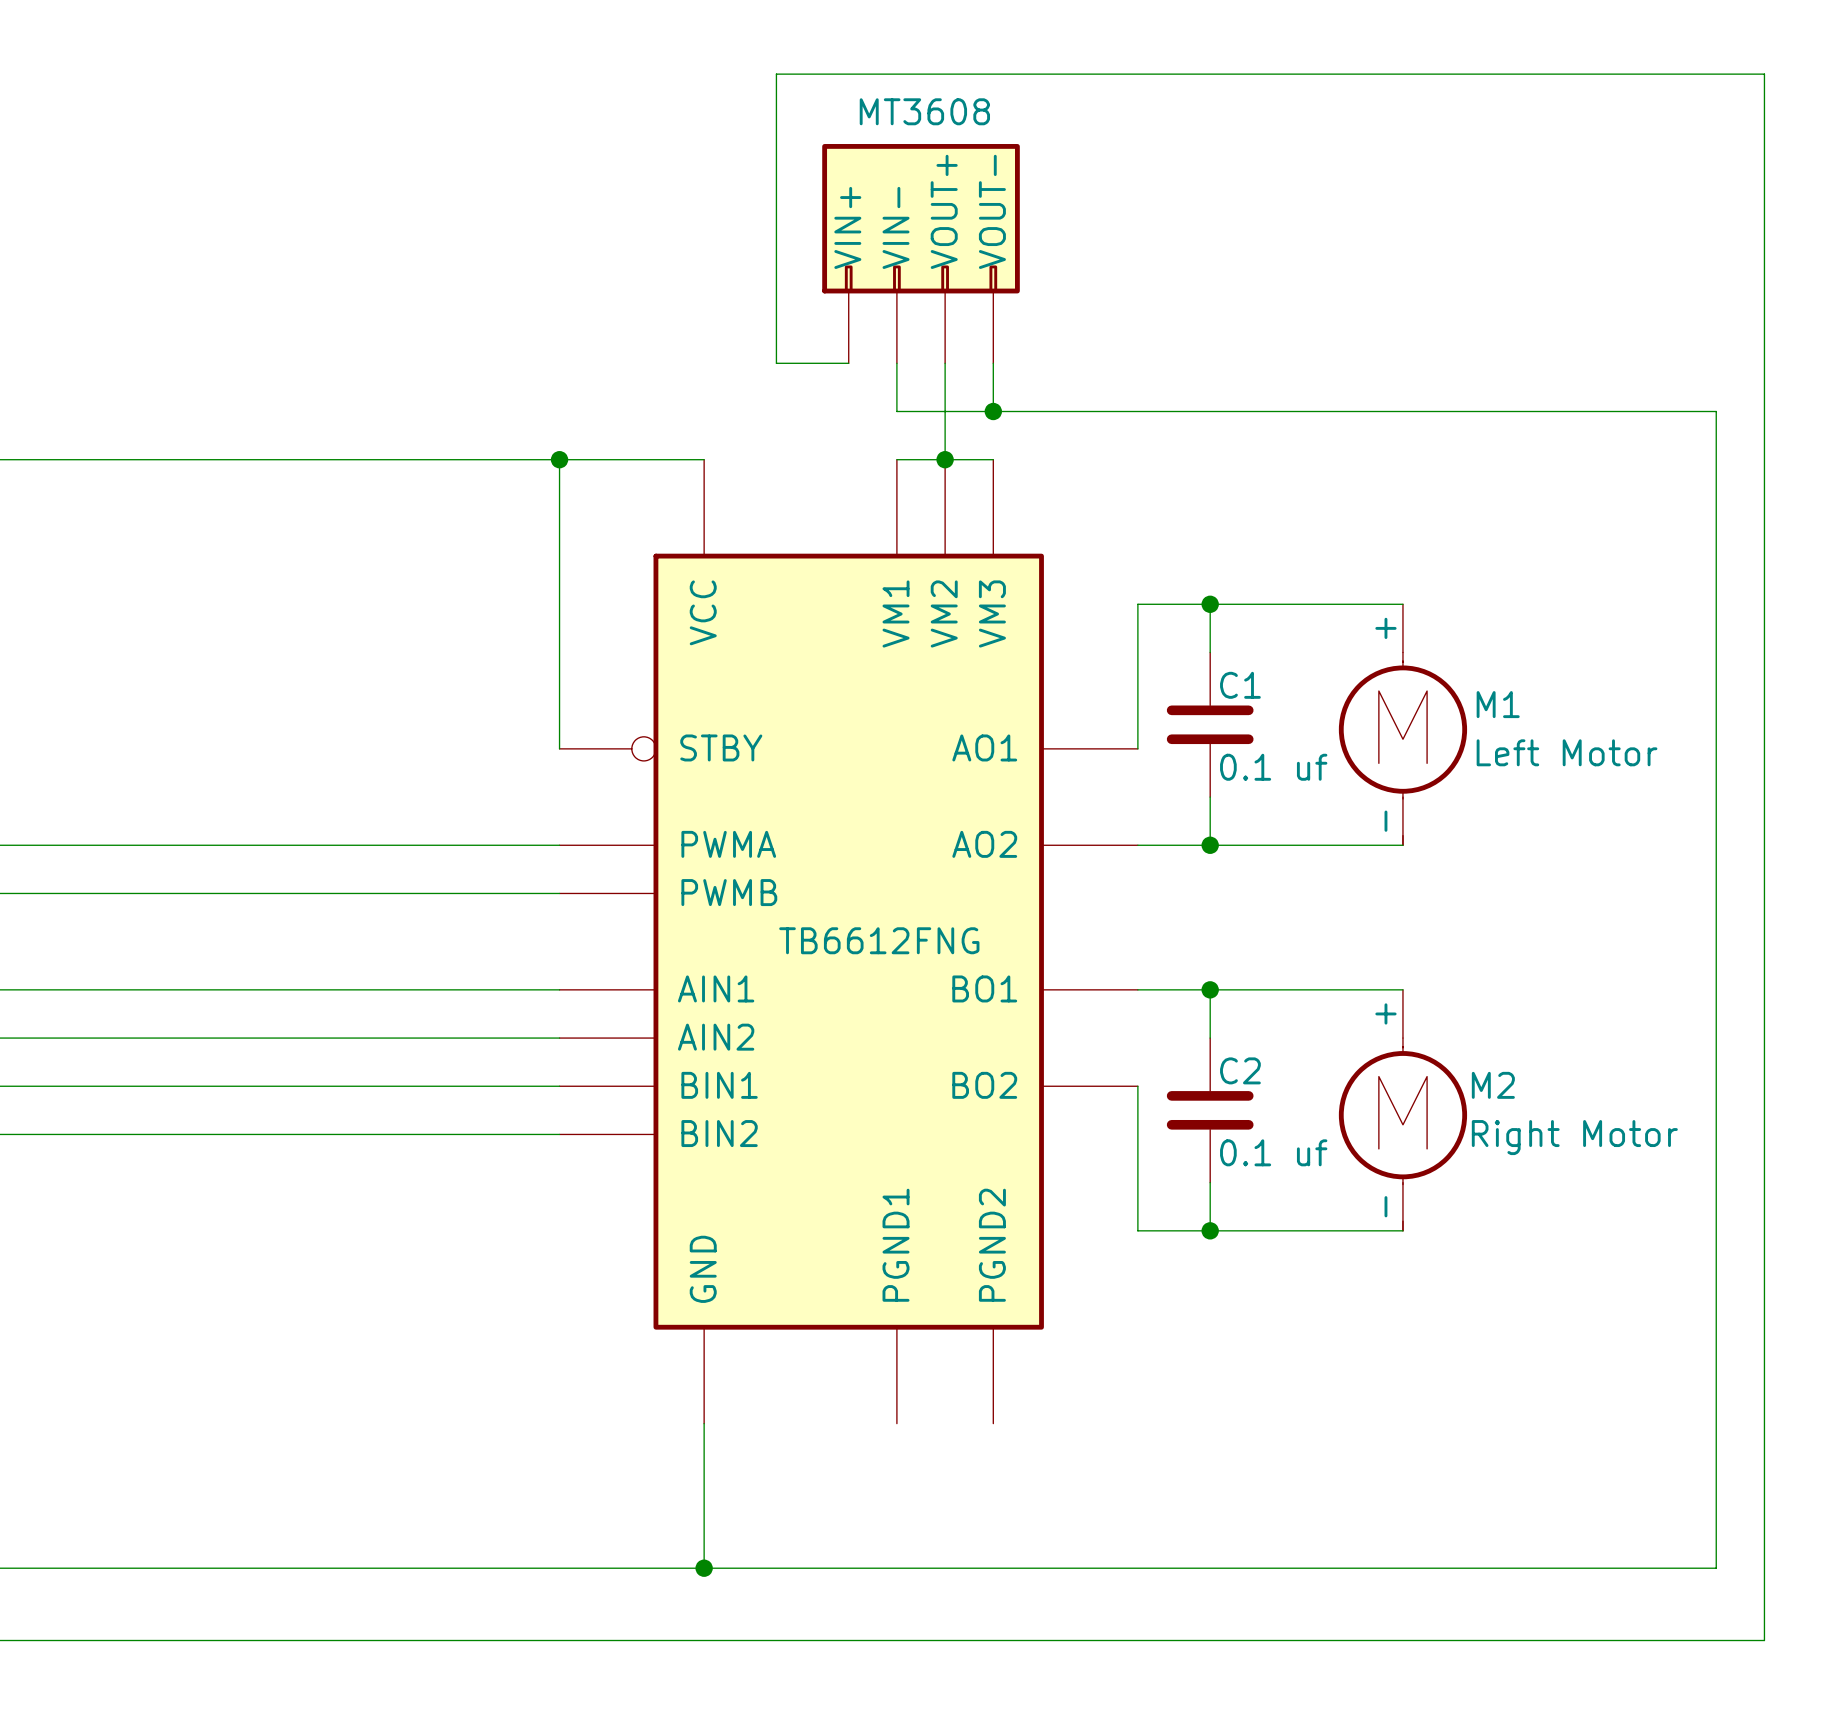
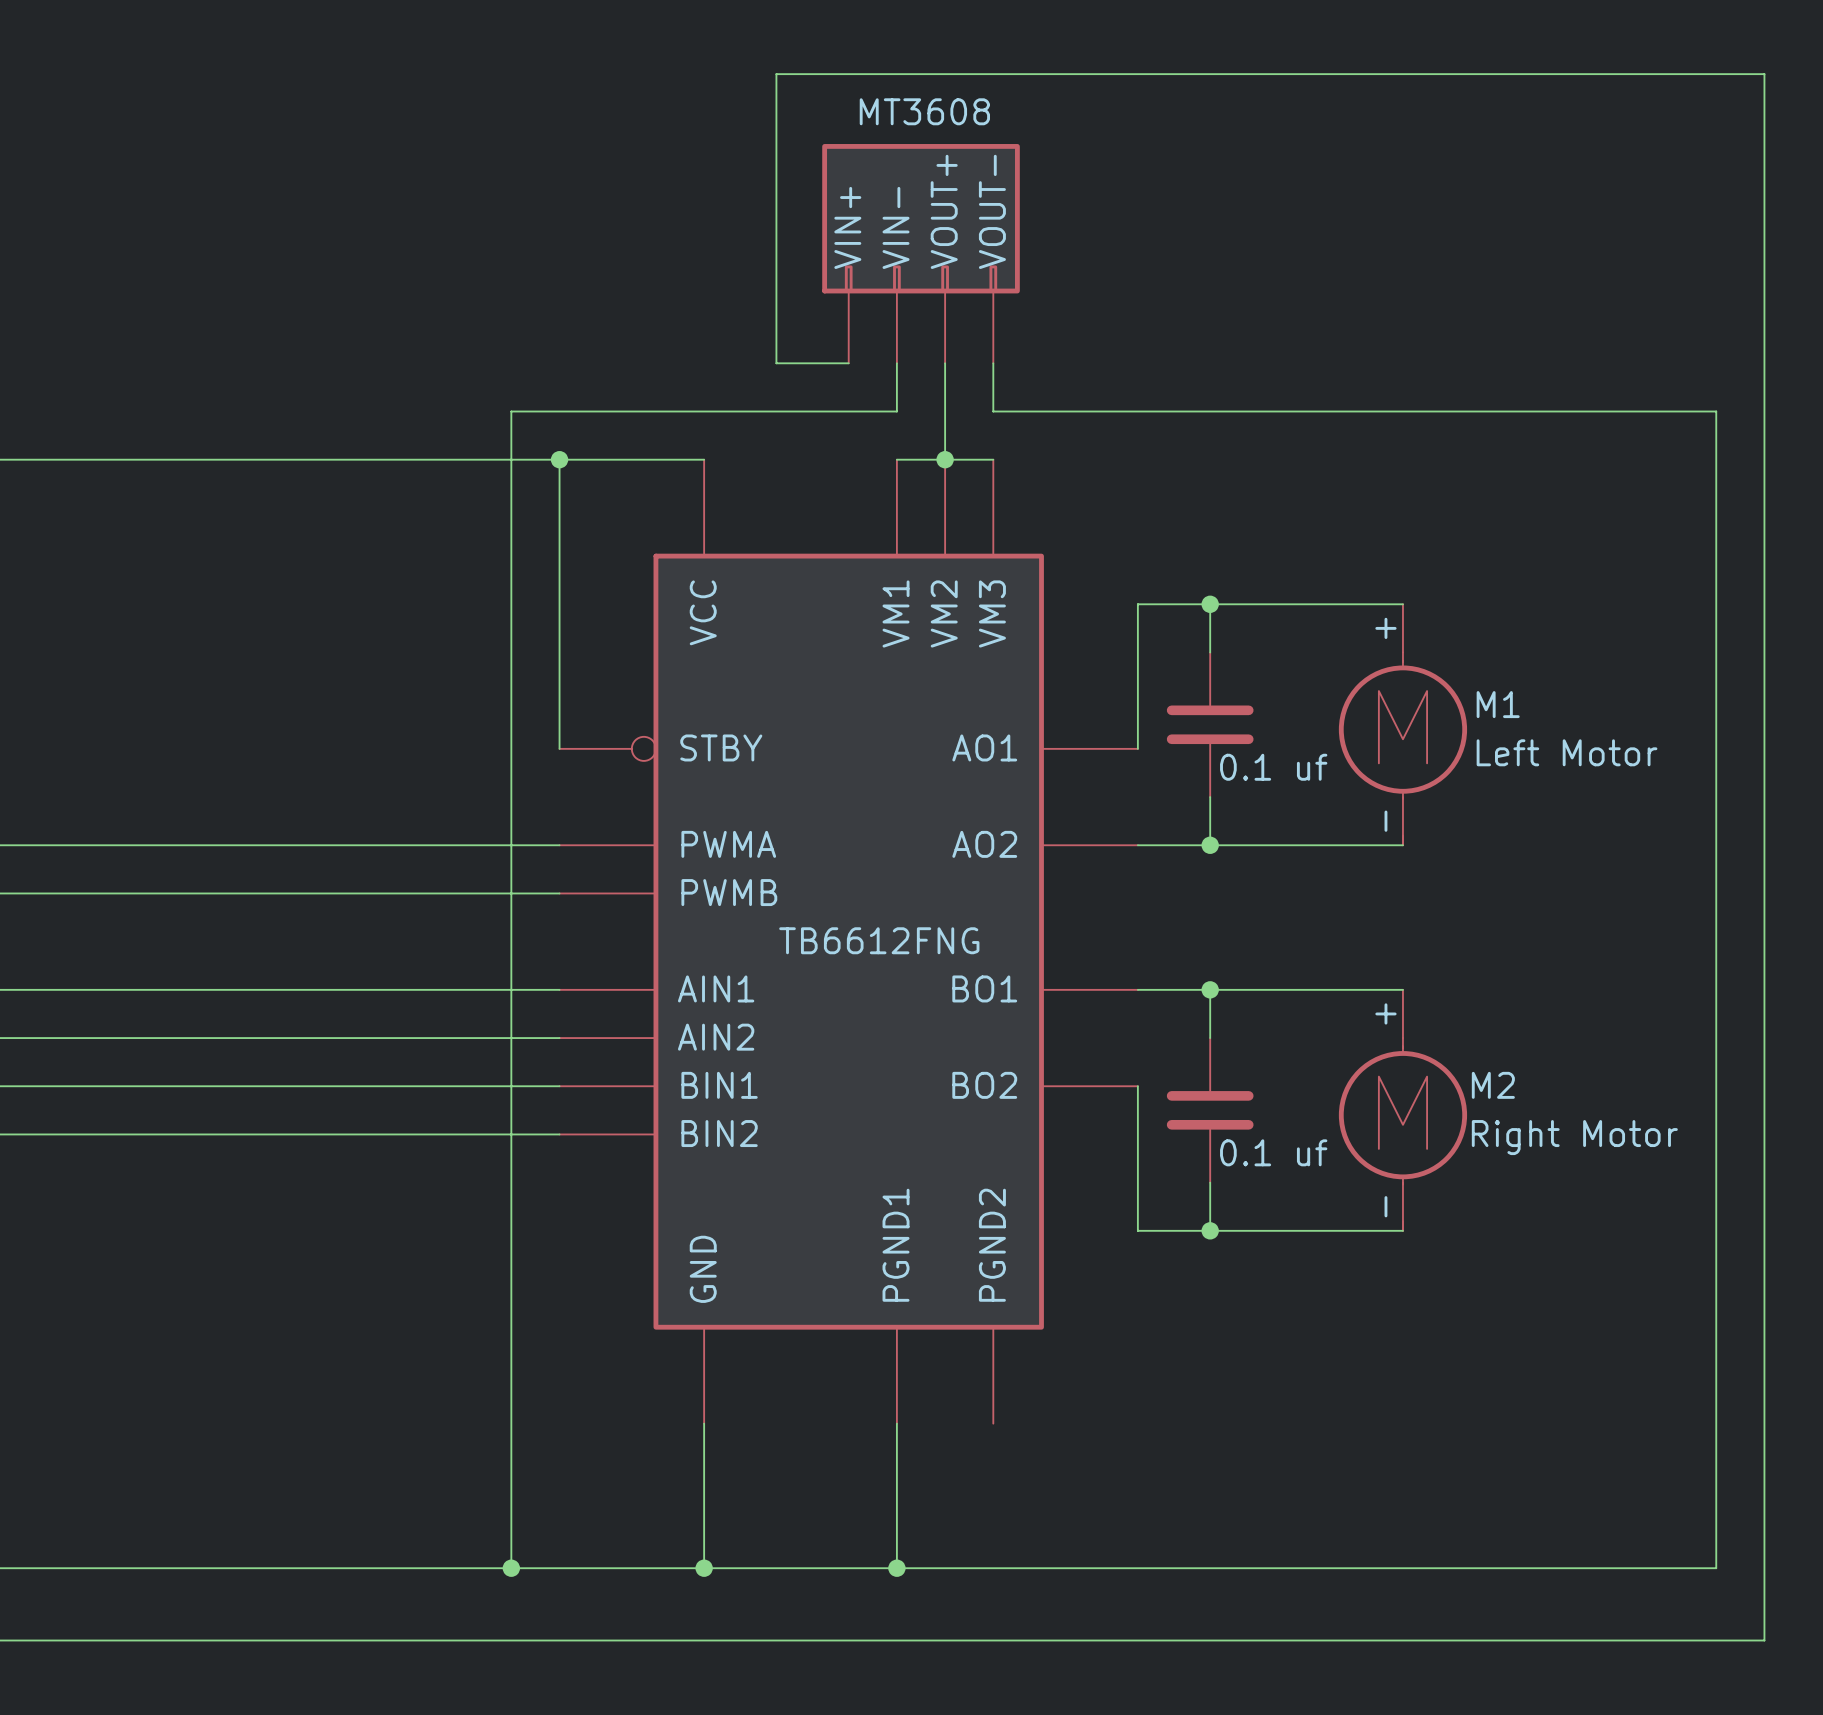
wire: (896, 411) (993, 411) -> (896, 411) (511, 411) (511, 1568)
junction: (993, 411) -> none
C1 name: C1 (1240, 685) -> none
C2 name: C2 (1240, 1070) -> none
wire: none -> (896, 1423) (896, 1568)
junction: none -> (511, 1568)
junction: none -> (896, 1568)

